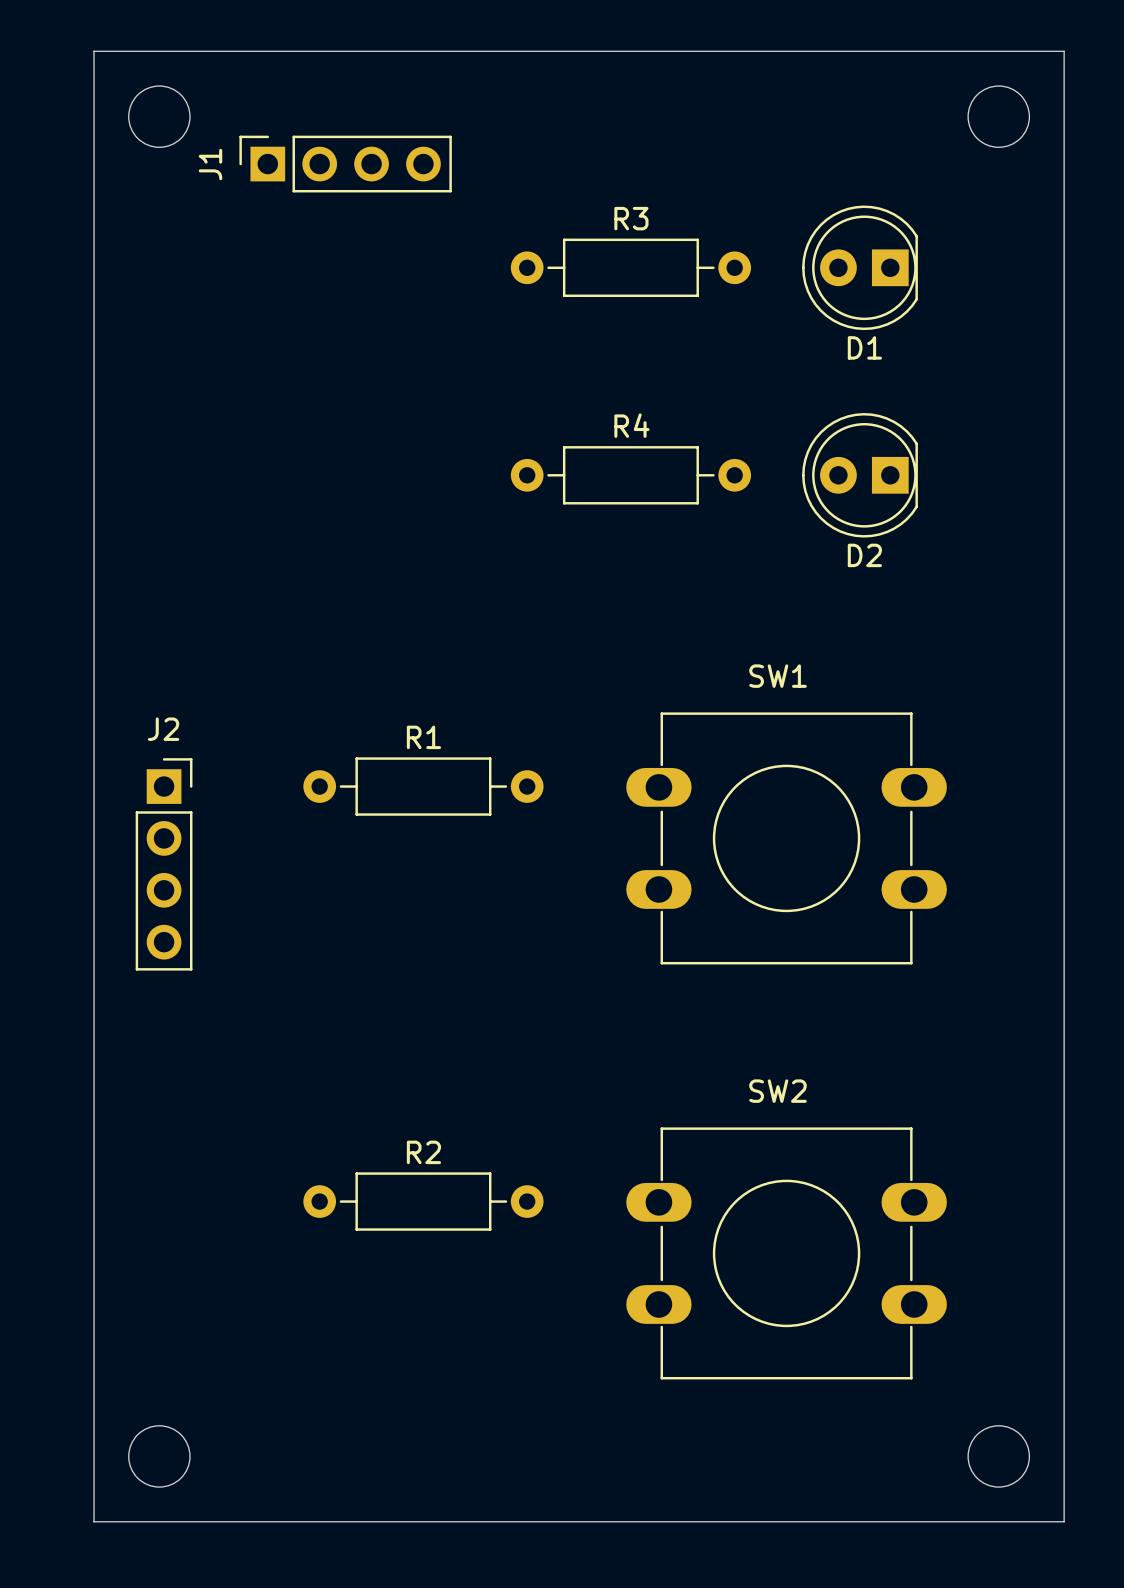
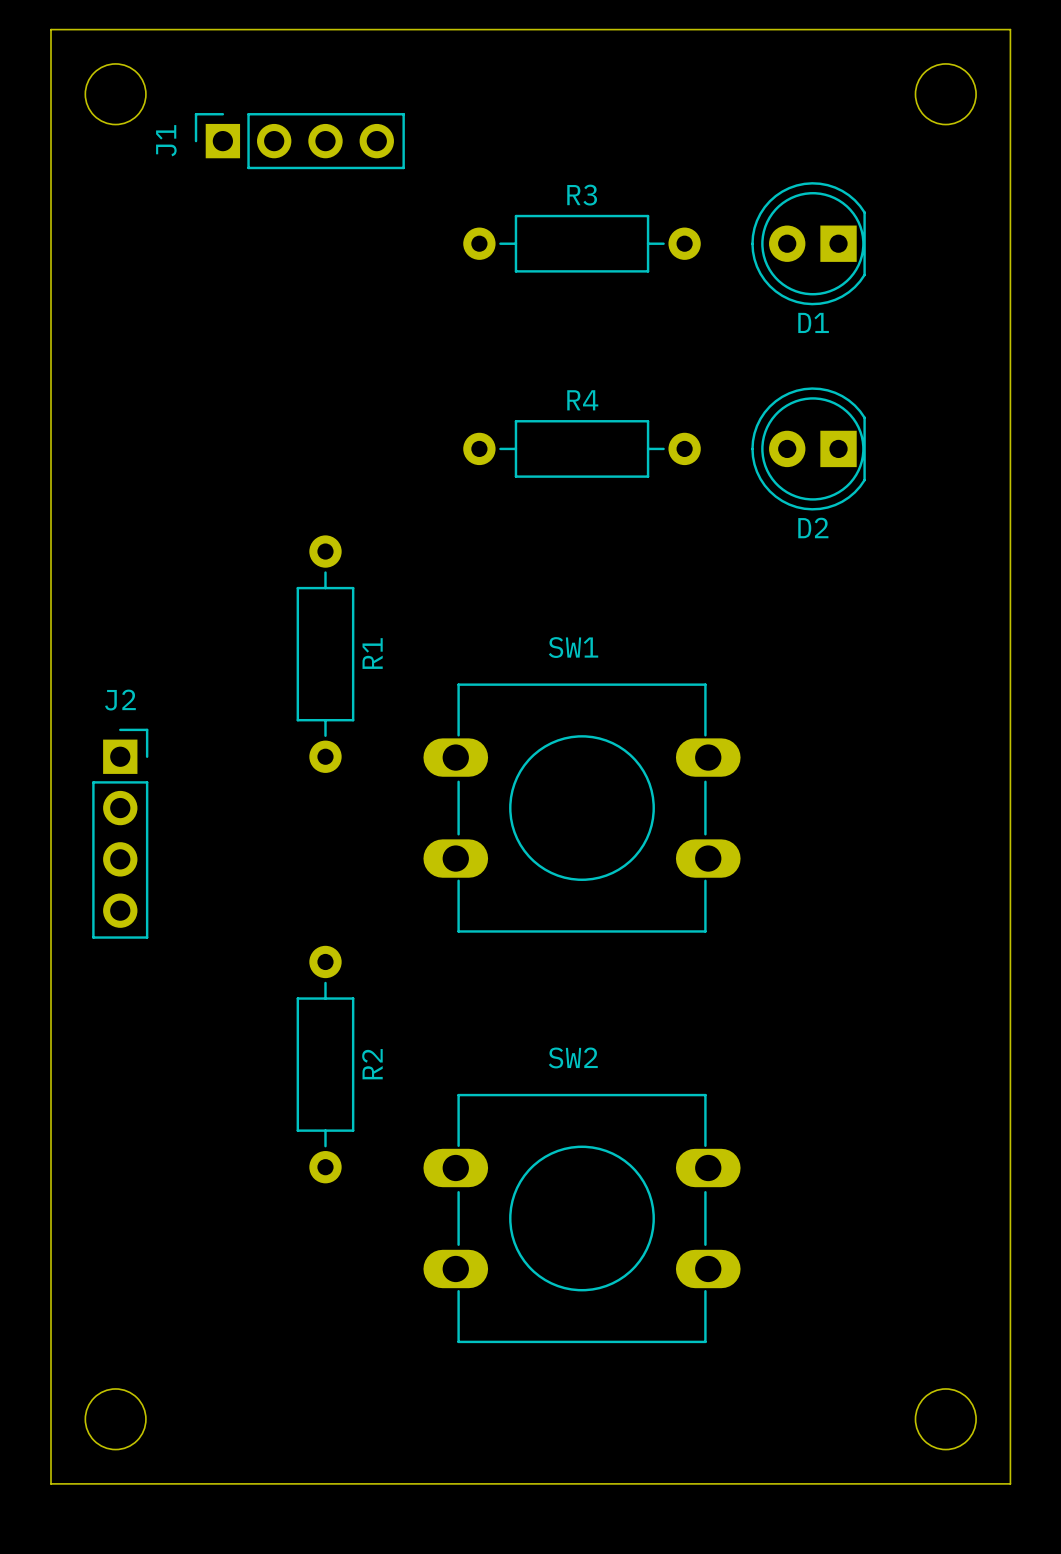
R1 rotation: 0° (423, 786) -> 90° clockwise (325, 654)
SW1 position: (786, 838) -> (582, 808)
R2 rotation: 0° (423, 1201) -> 90° clockwise (325, 1064)
SW2 position: (786, 1253) -> (582, 1218)

